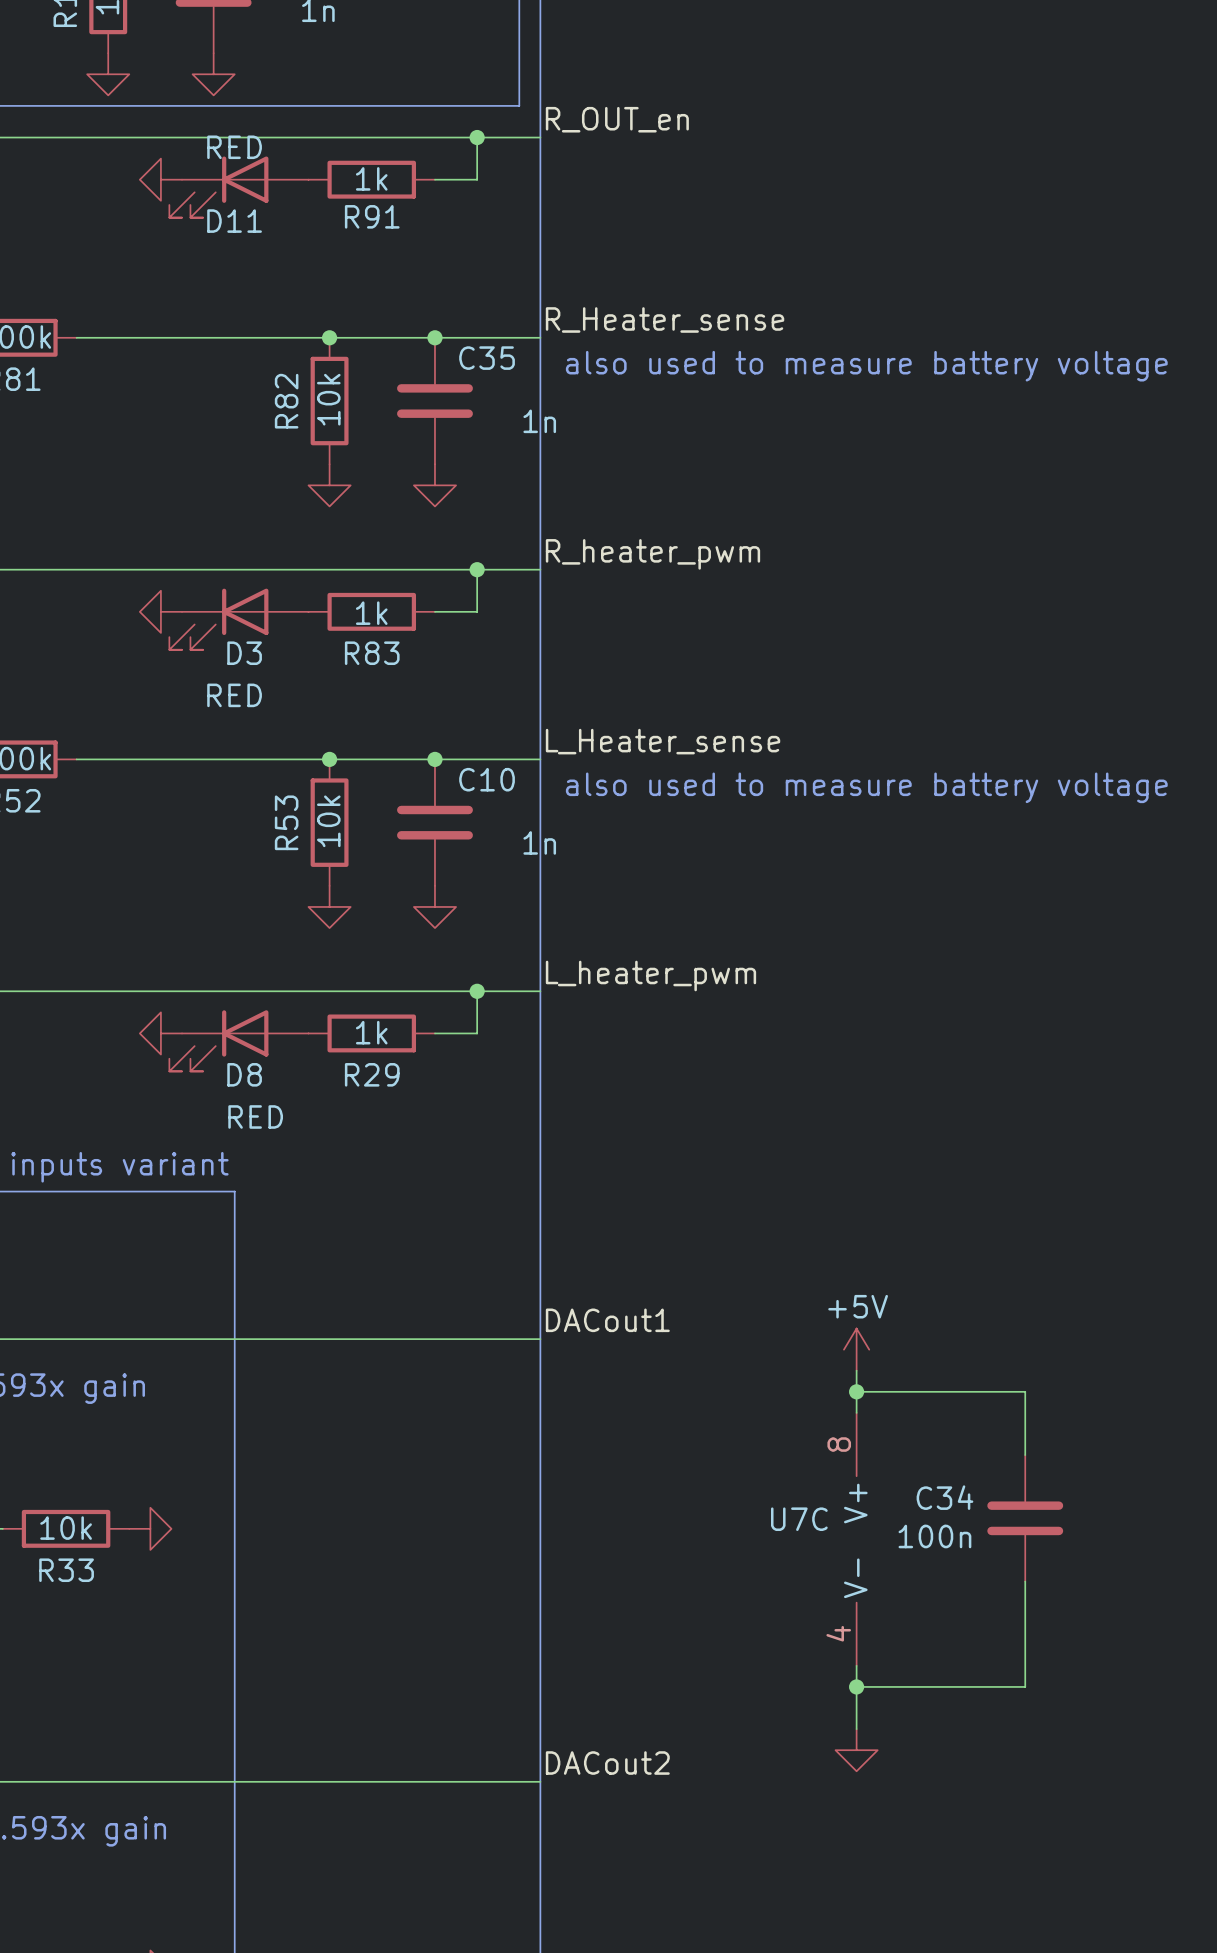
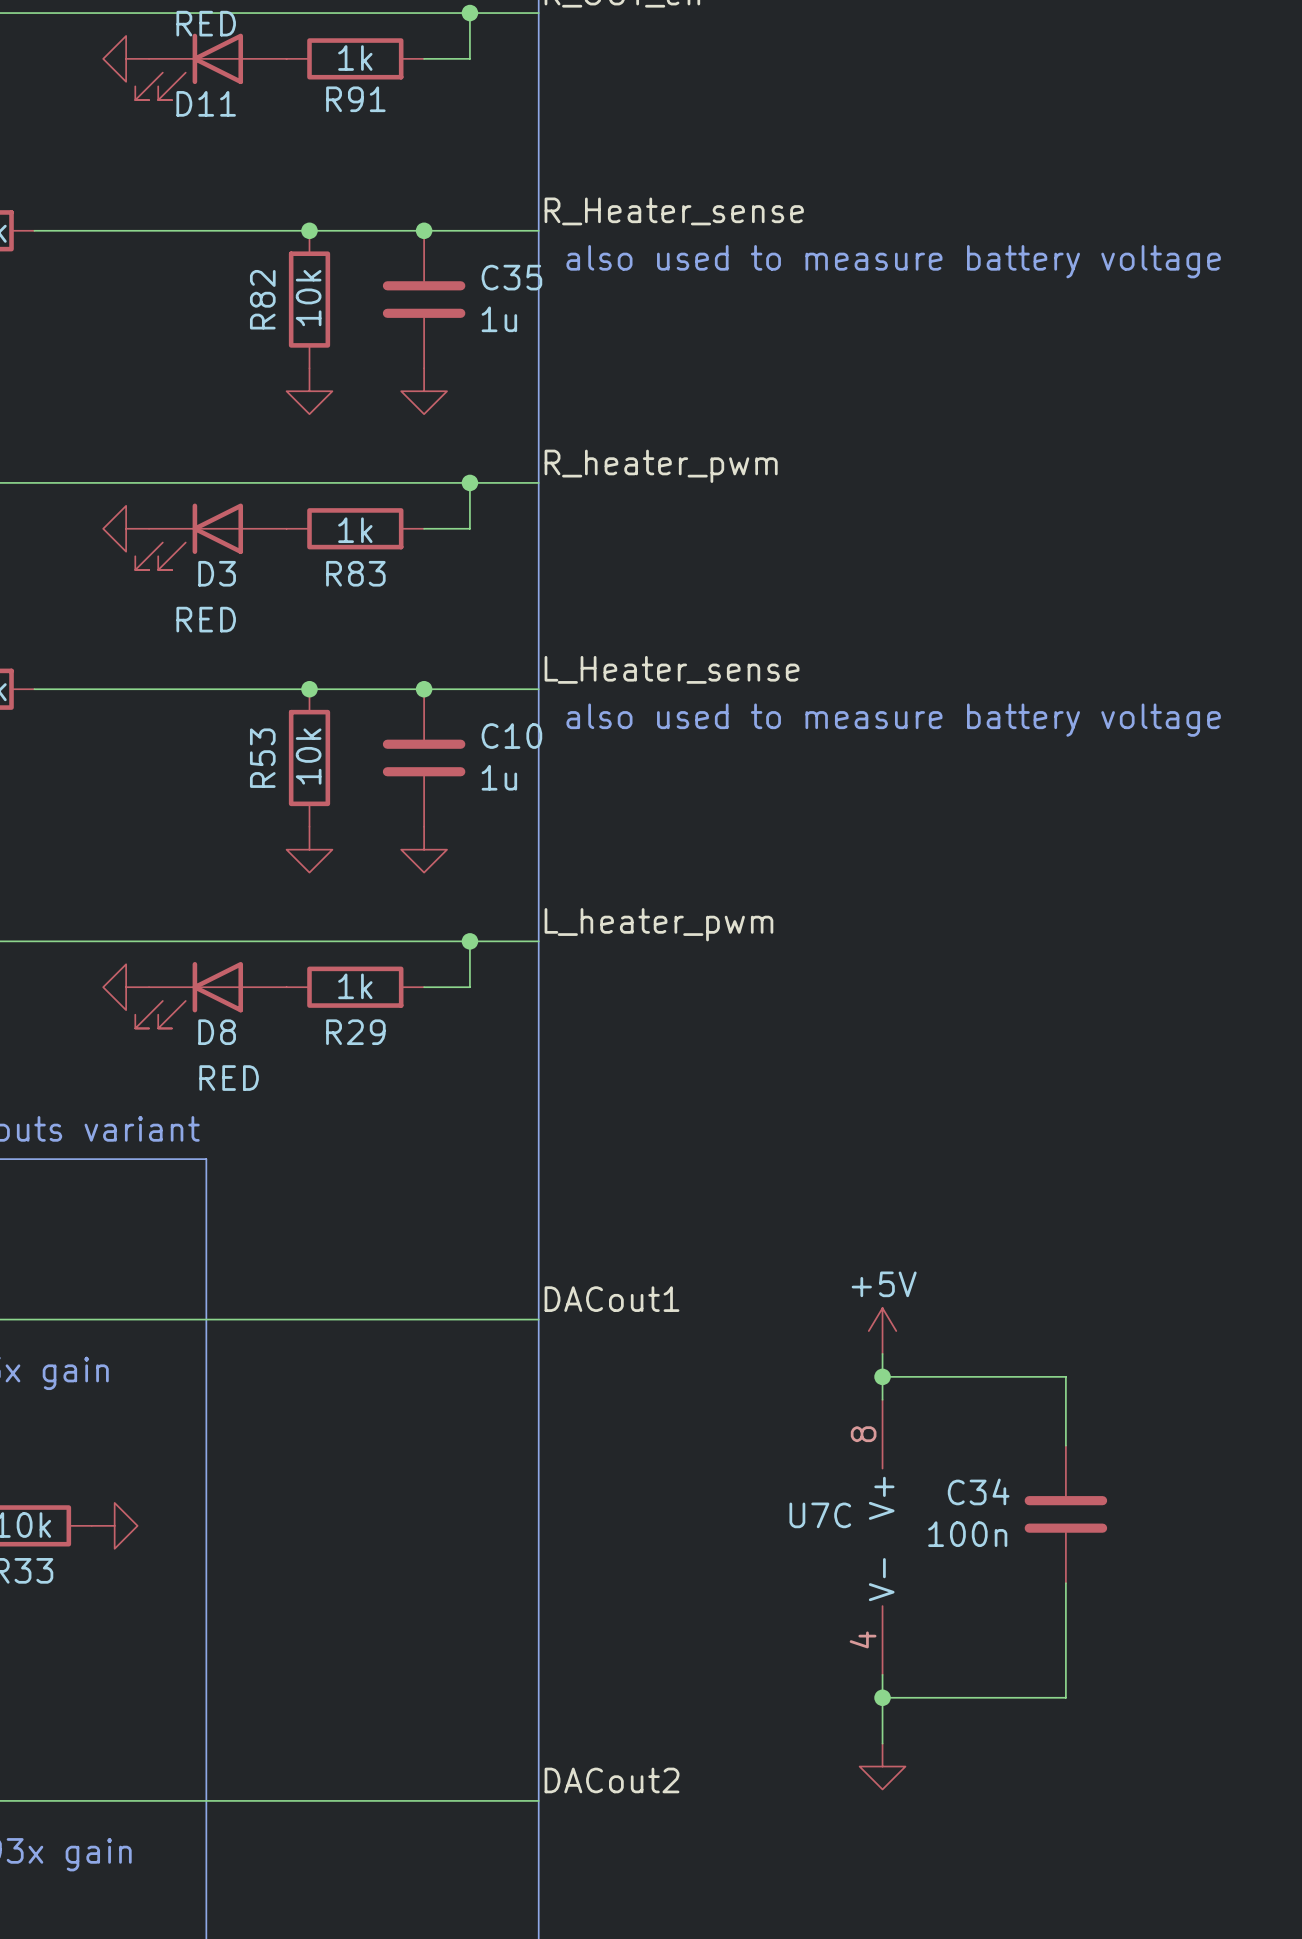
C35 name position: C35 (487, 358) -> C35 (511, 277)
C35 value: 1n (539, 421) -> 1u (499, 319)
C10 name position: C10 (487, 779) -> C10 (511, 736)
C10 value: 1n (539, 842) -> 1u (499, 777)

